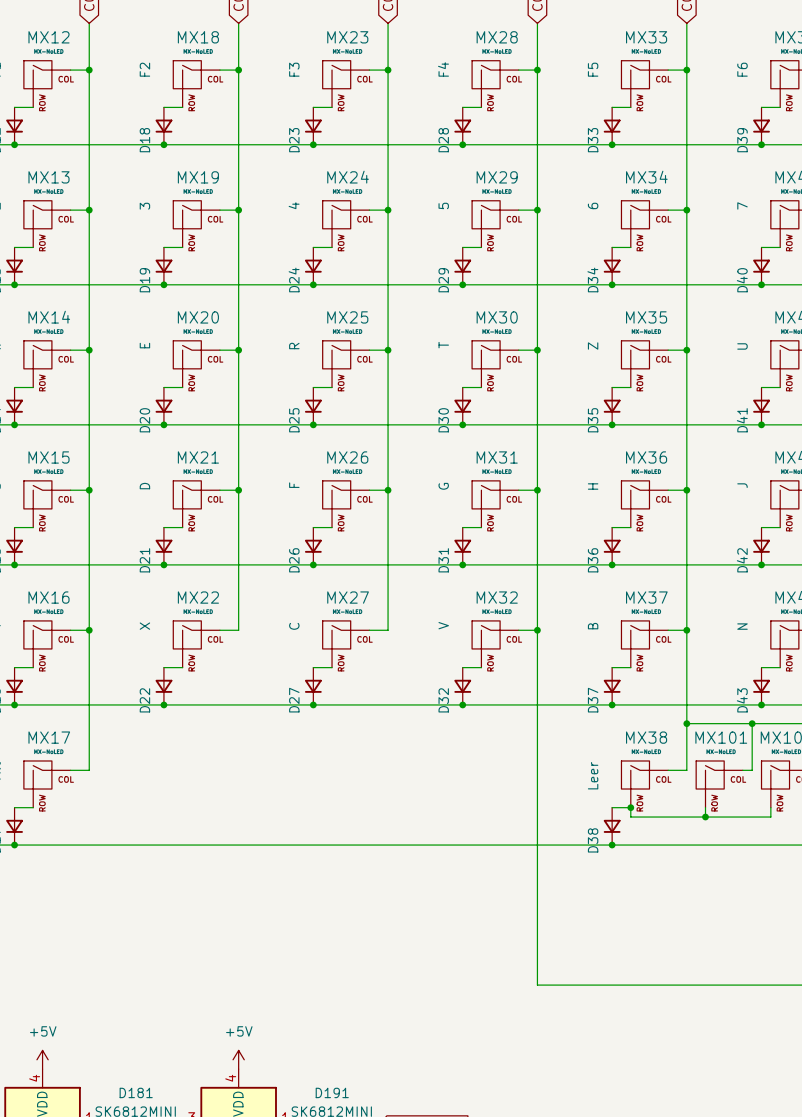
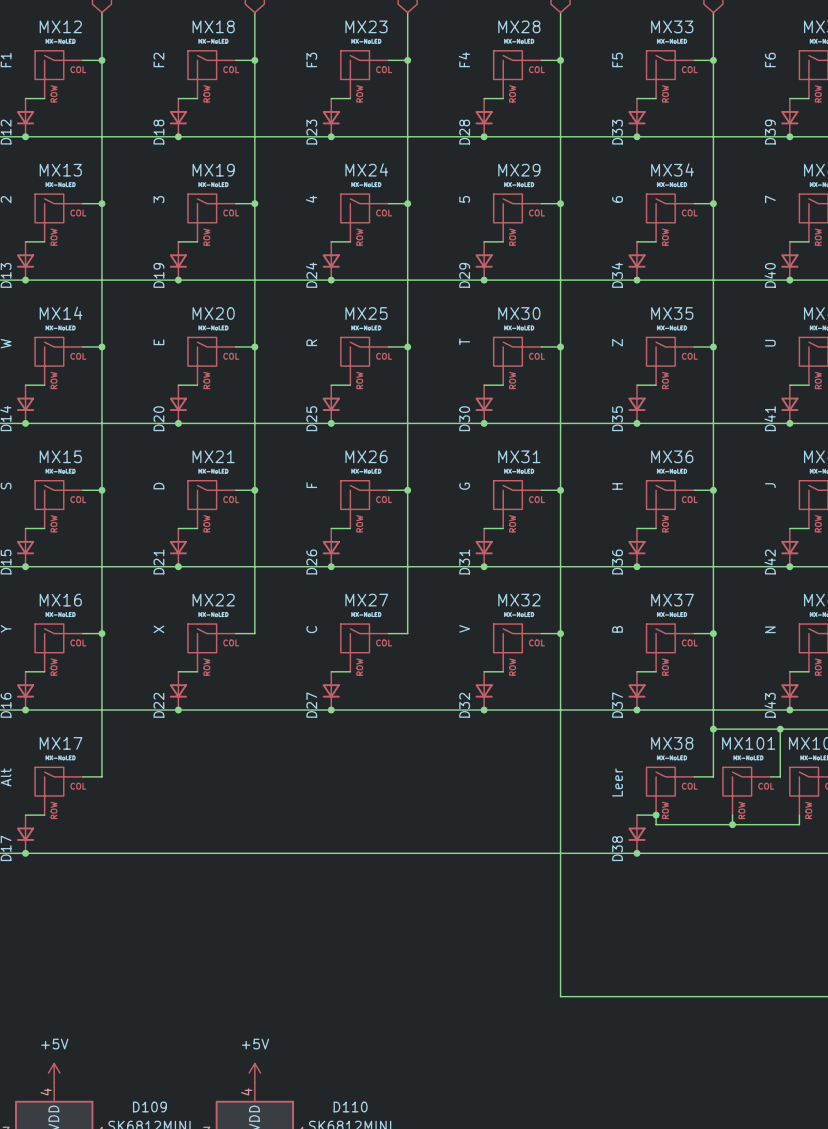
D181 name: D181 (136, 1092) -> D109 (149, 1107)
D191 name: D191 (332, 1092) -> D110 (350, 1107)

